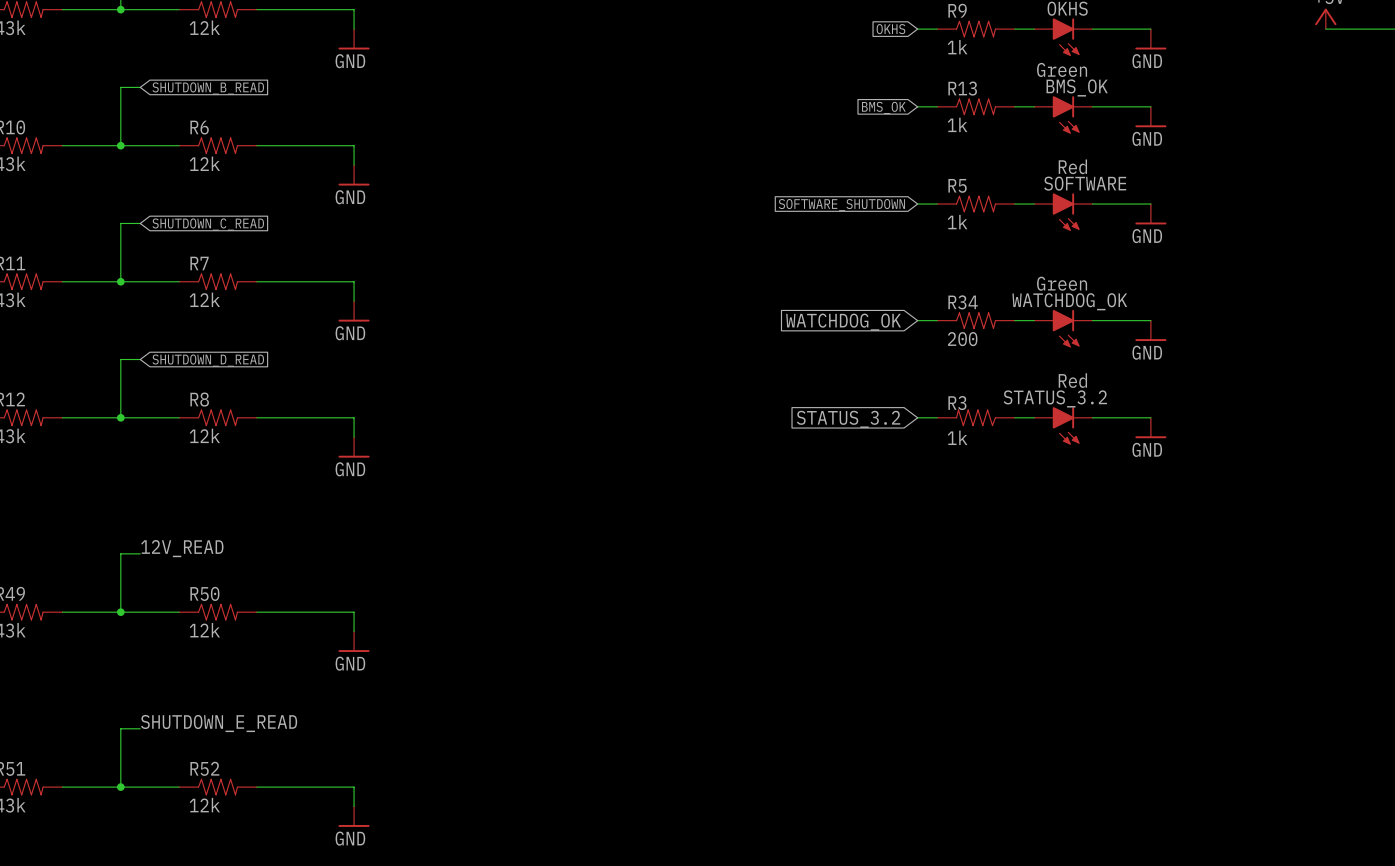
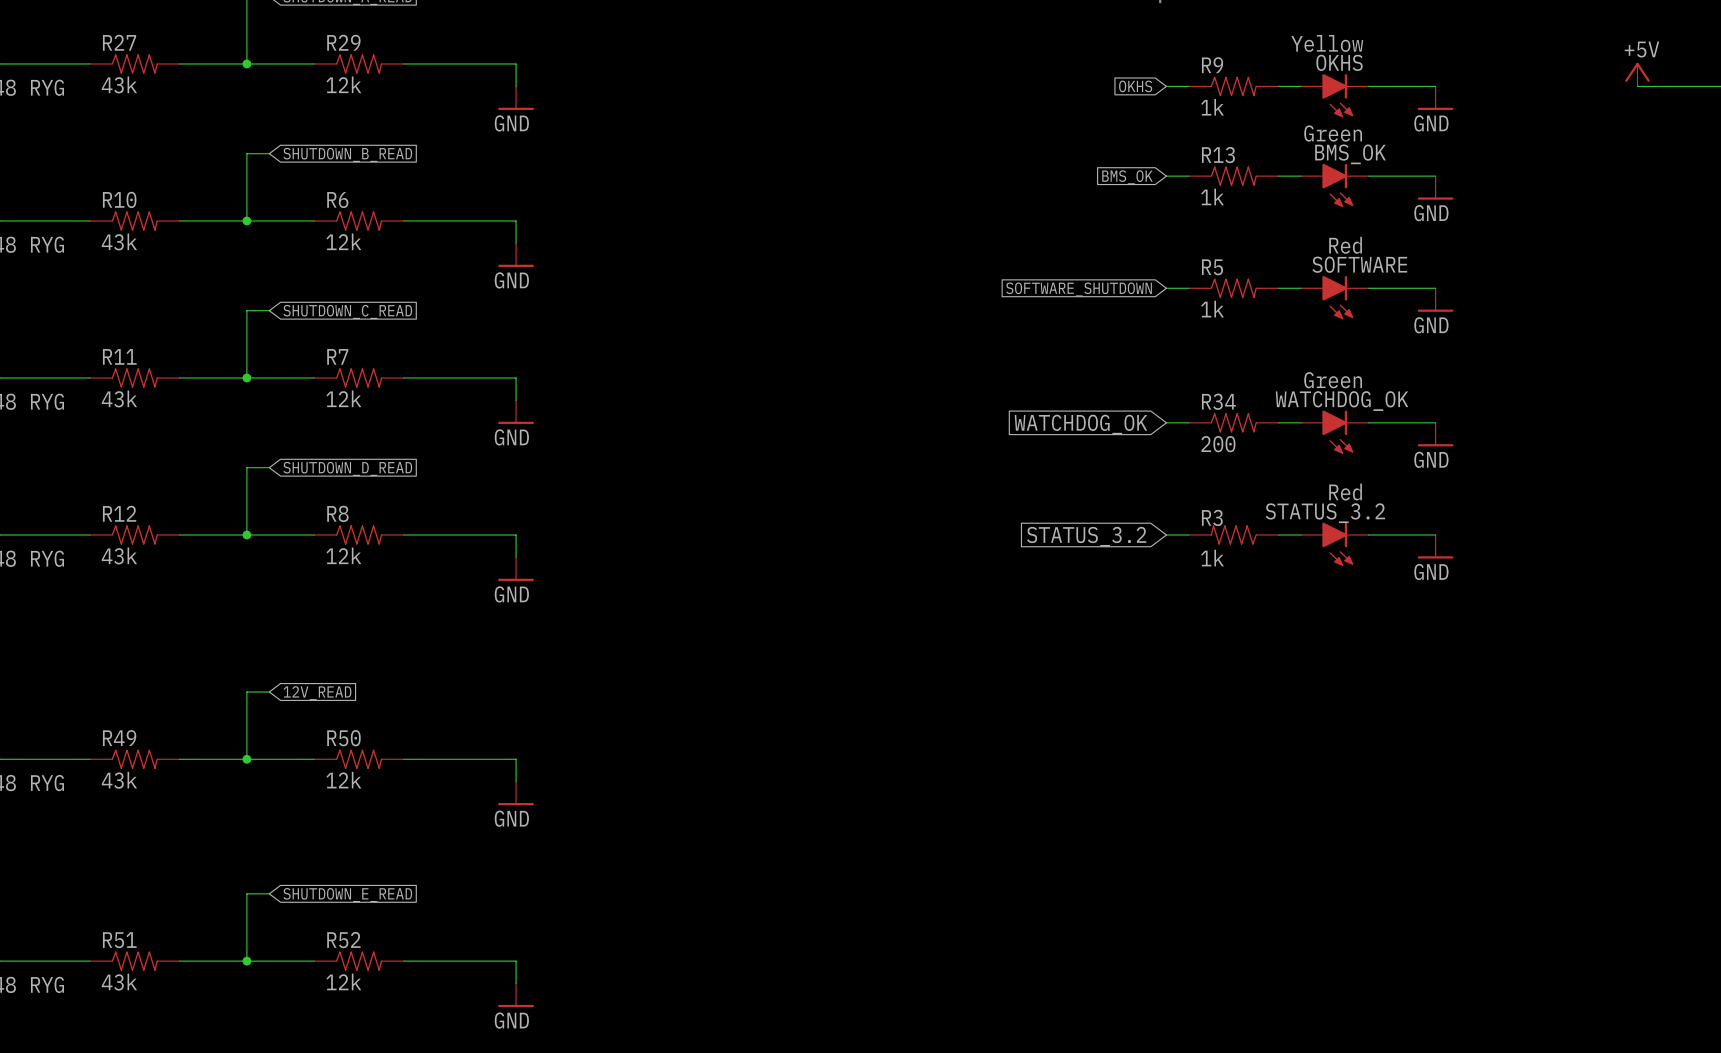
label: 12V_READ (182, 548) -> none
global label: none -> 12V_READ (317, 693)
label: SHUTDOWN_E_READ (219, 723) -> none
global label: none -> SHUTDOWN_E_READ (347, 895)

